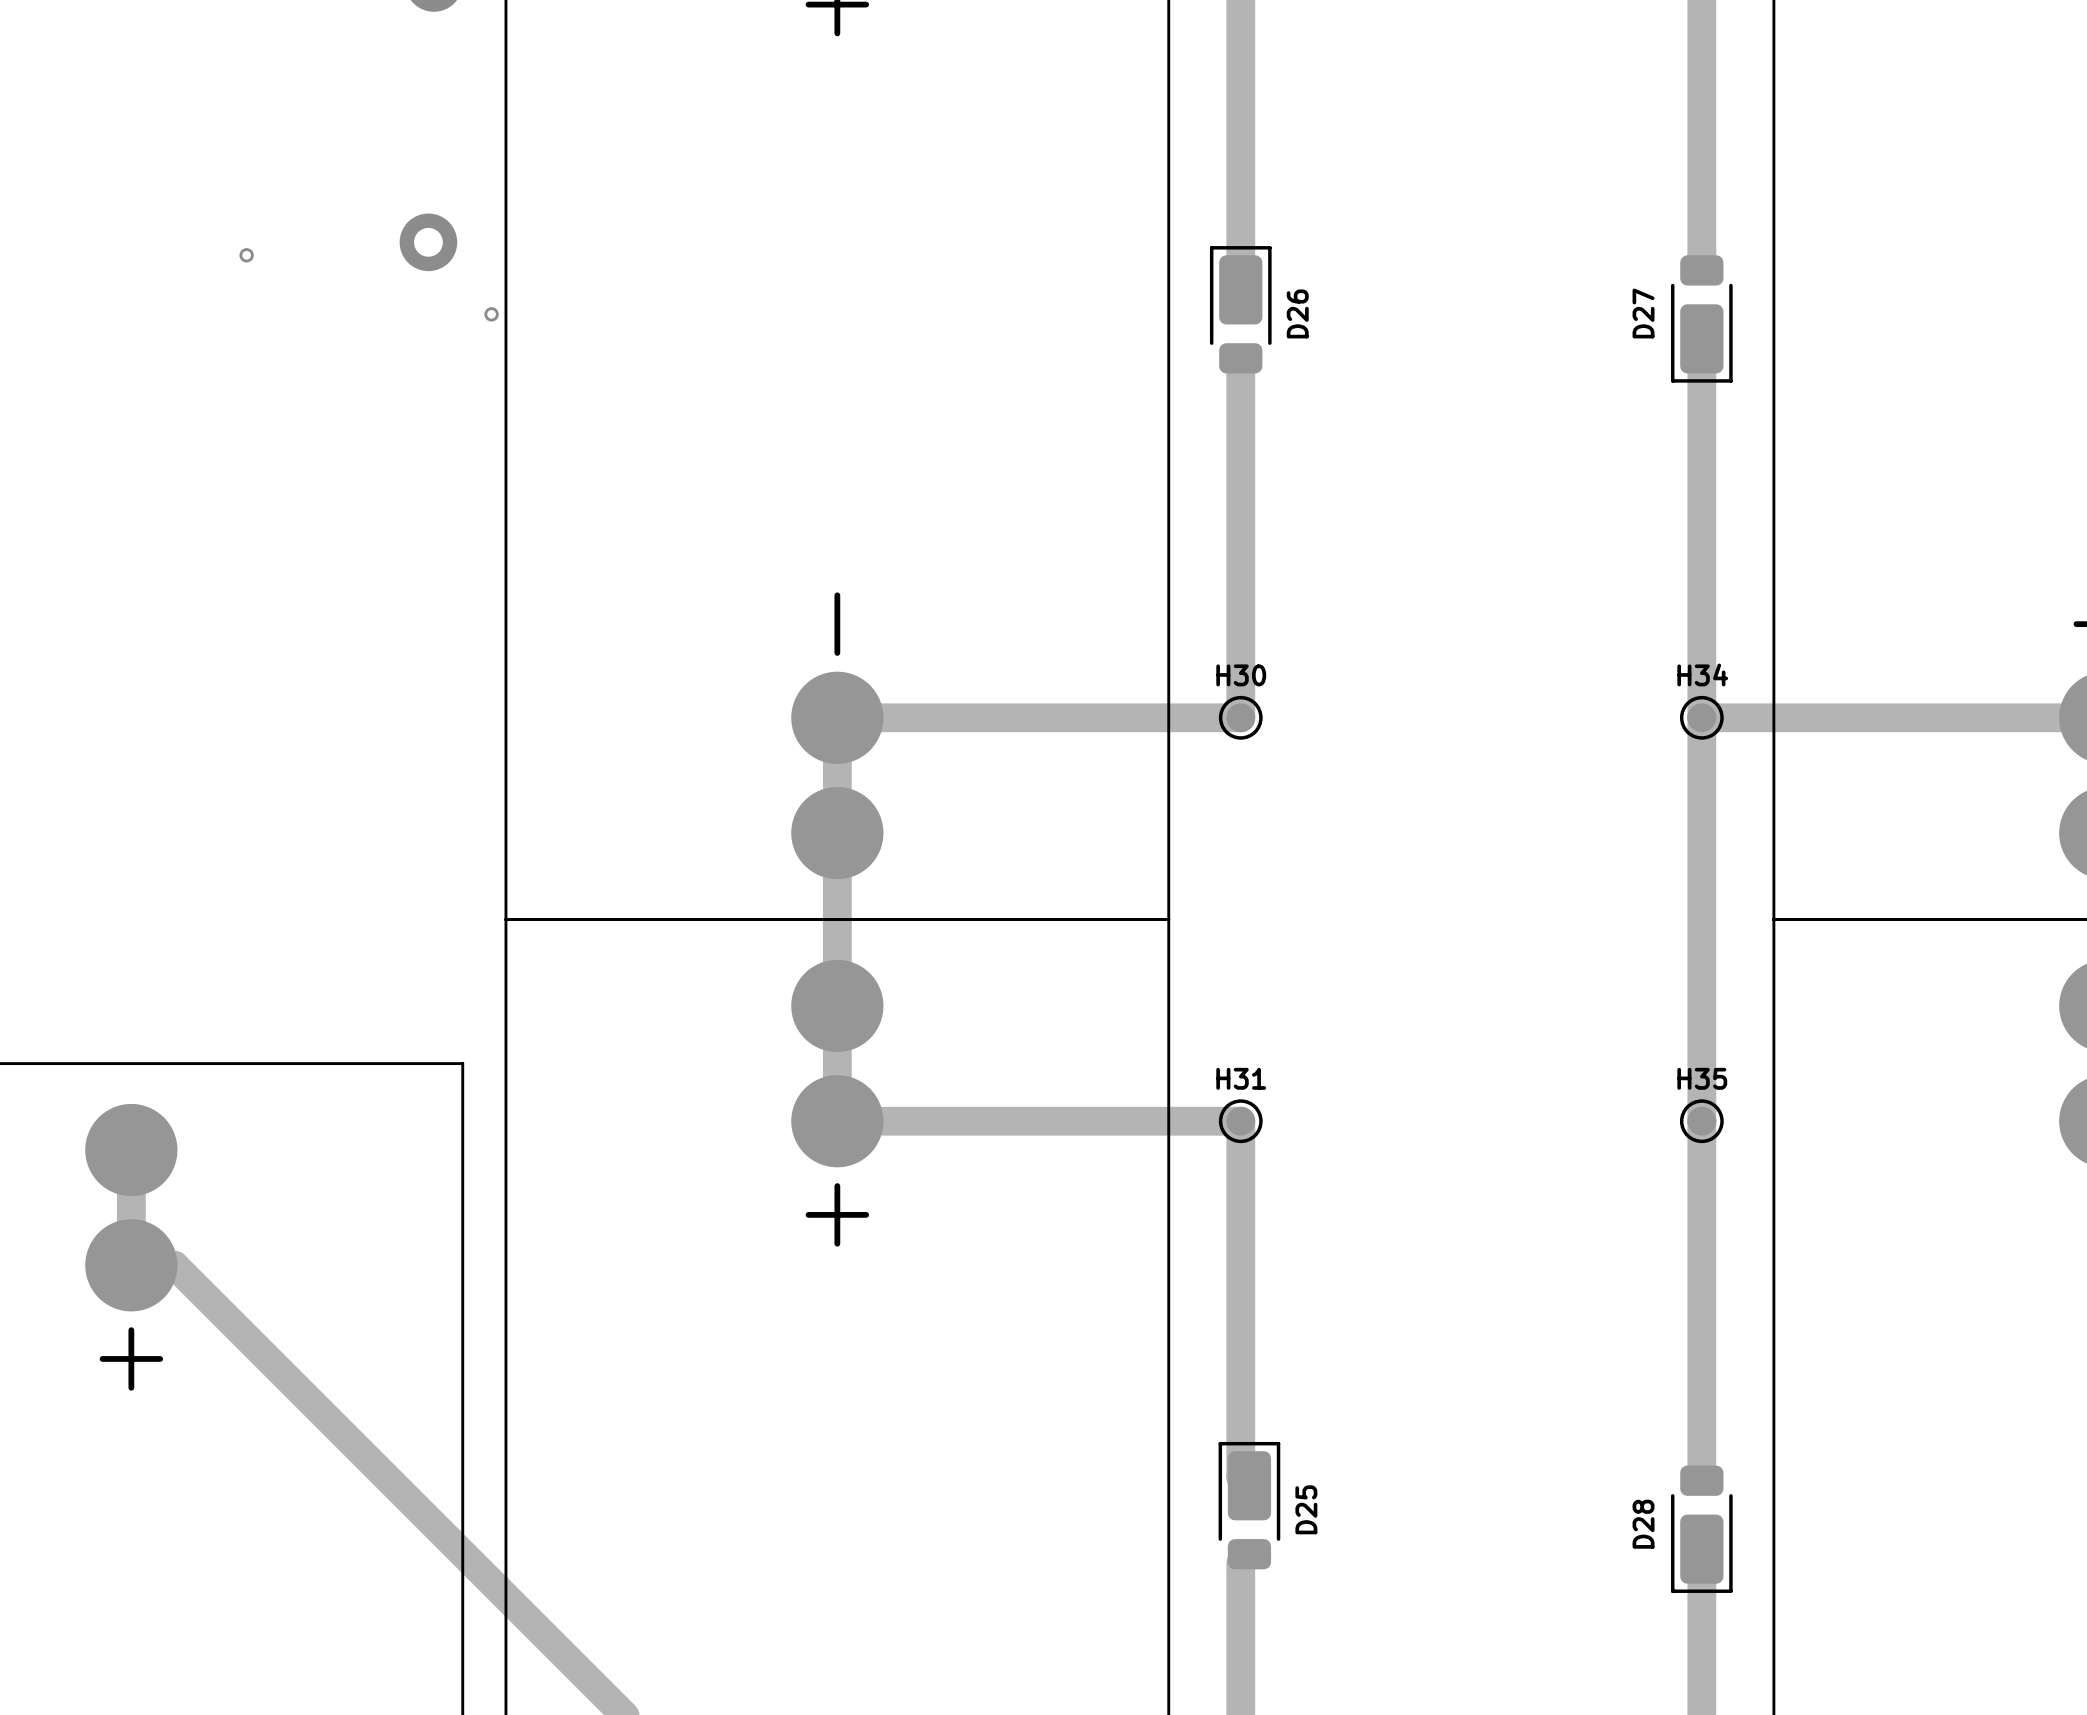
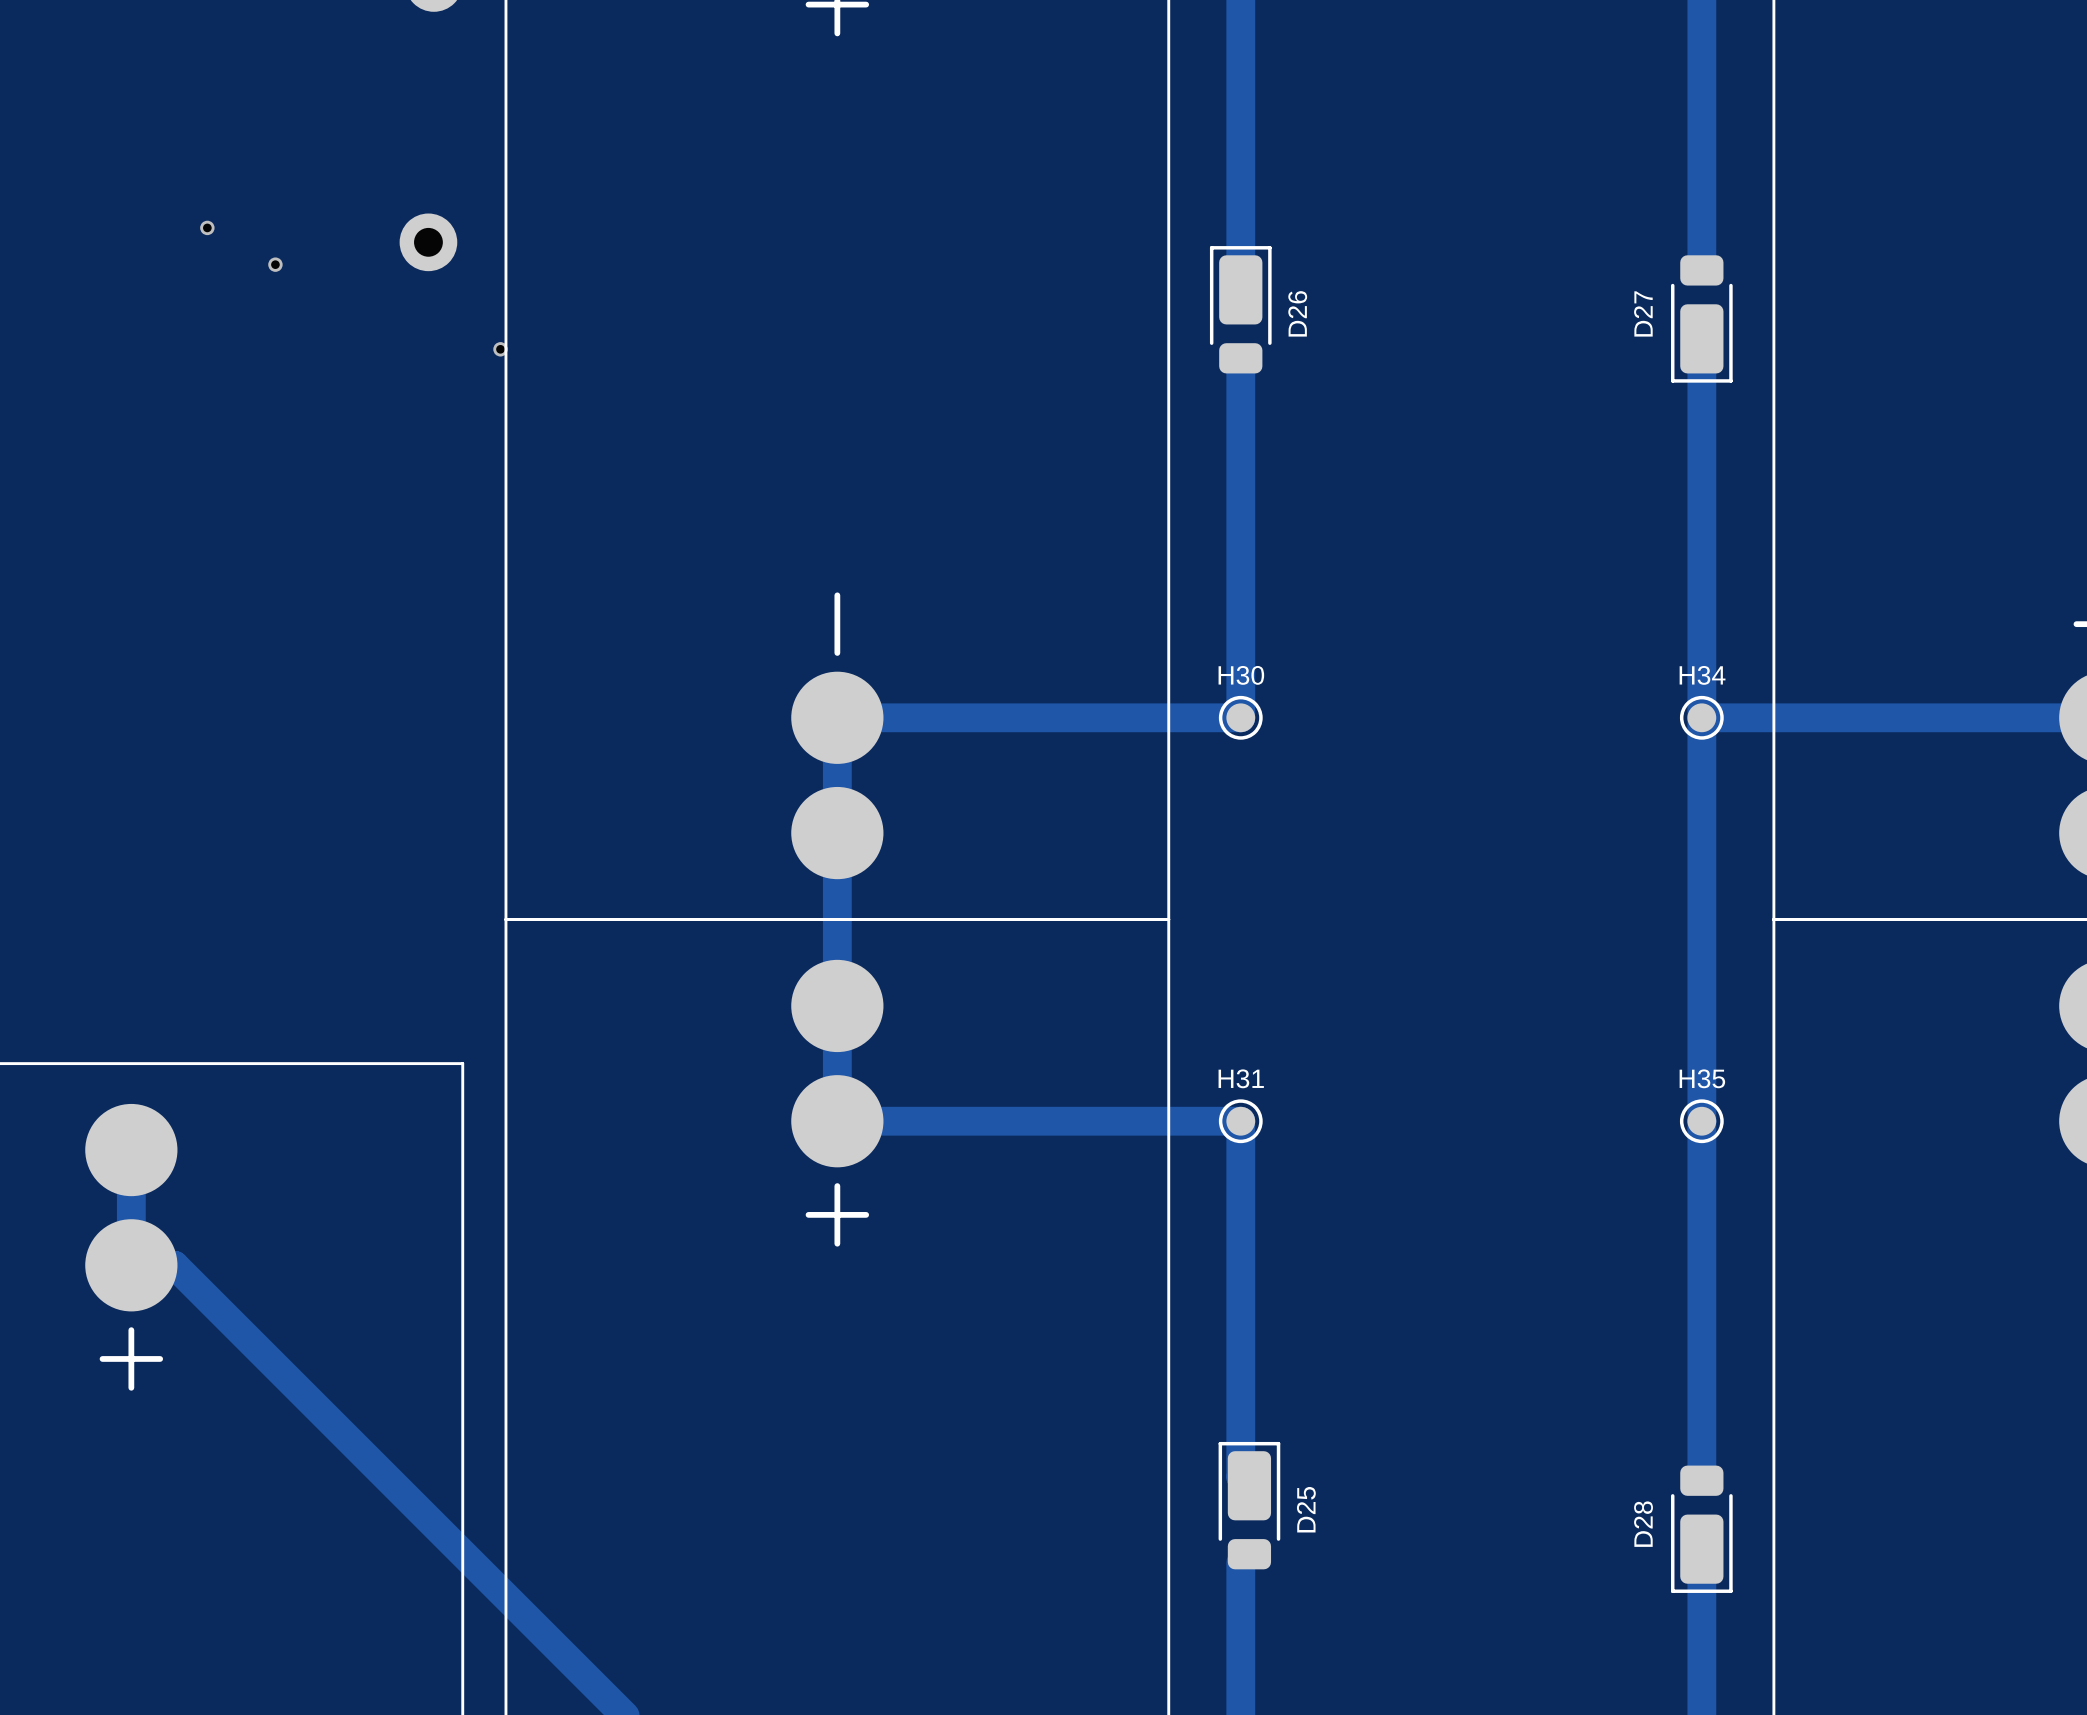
via: none -> (207, 227)
via: (246, 255) -> none
via: none -> (275, 264)
via position: (491, 314) -> (500, 349)

